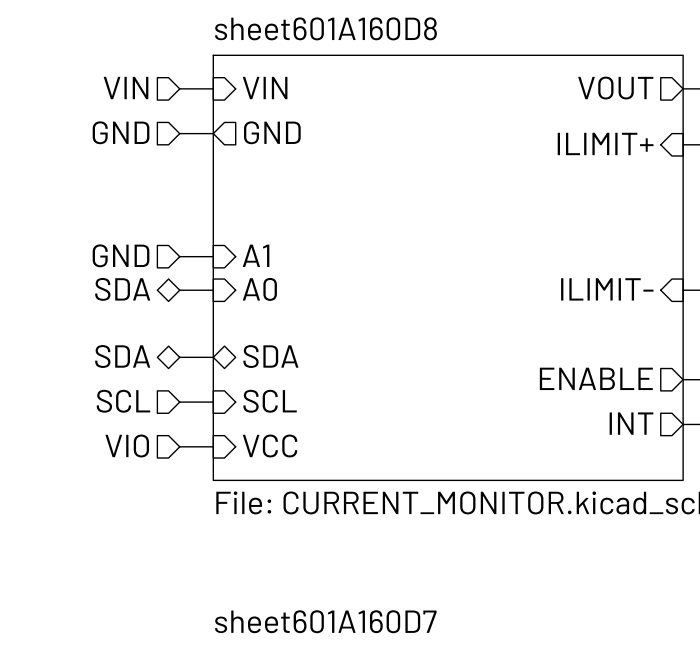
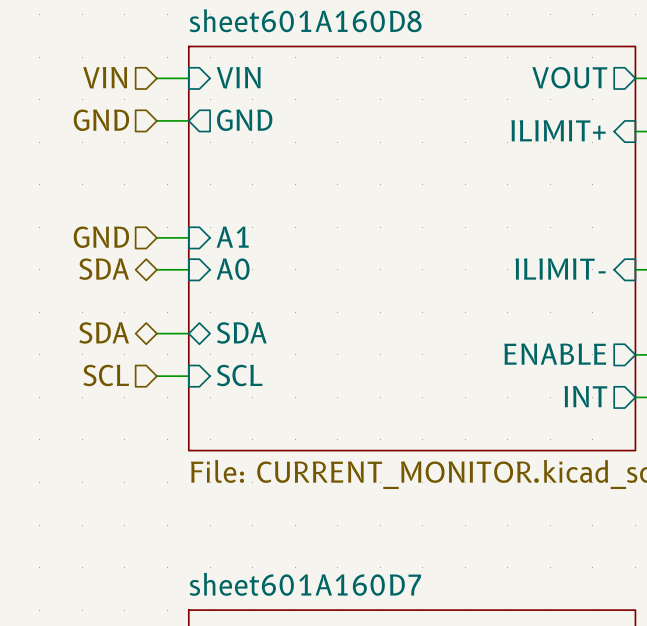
hierarchical label: VIO (127, 445) -> none
wire: (179, 446) (213, 446) -> none
sheet pin: VCC (270, 446) -> none

